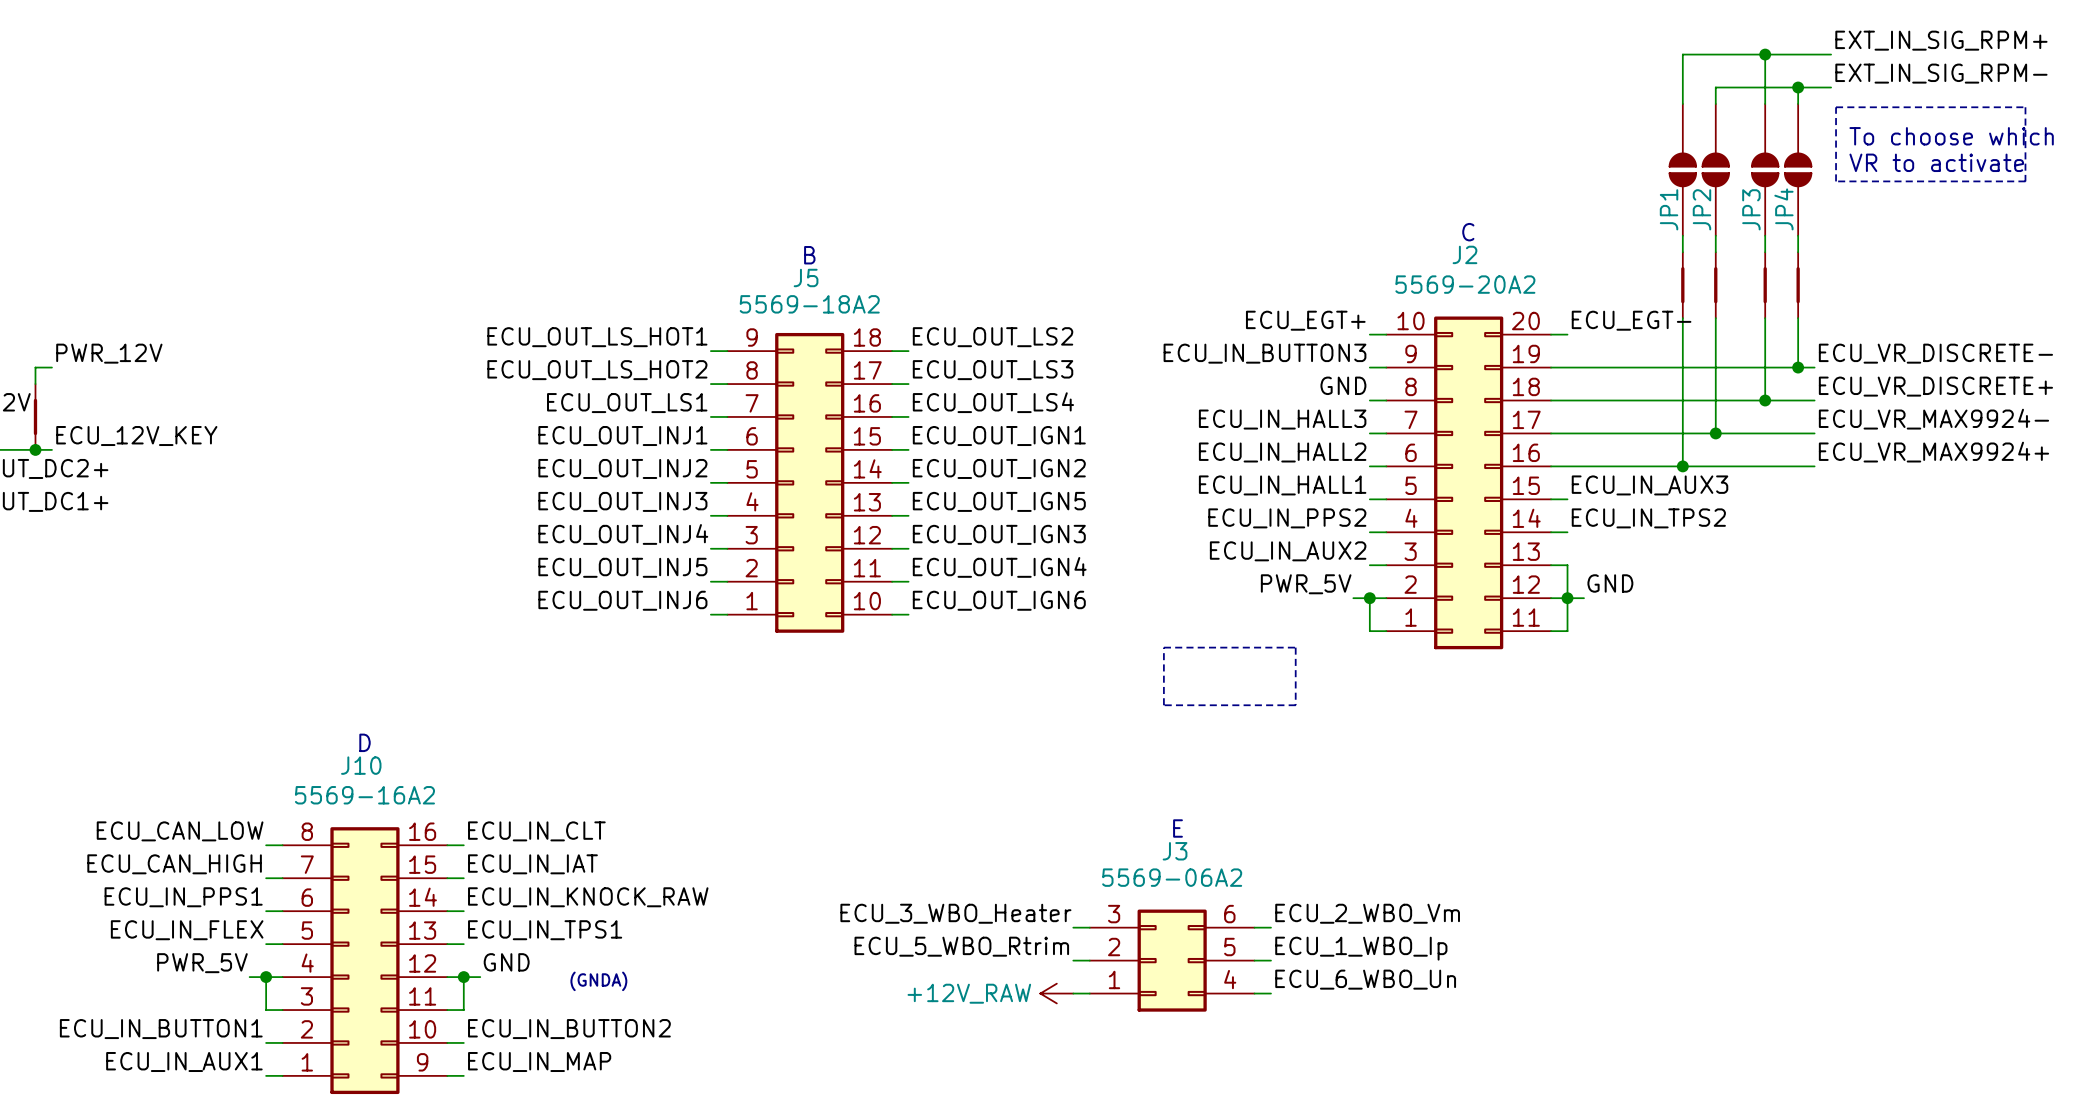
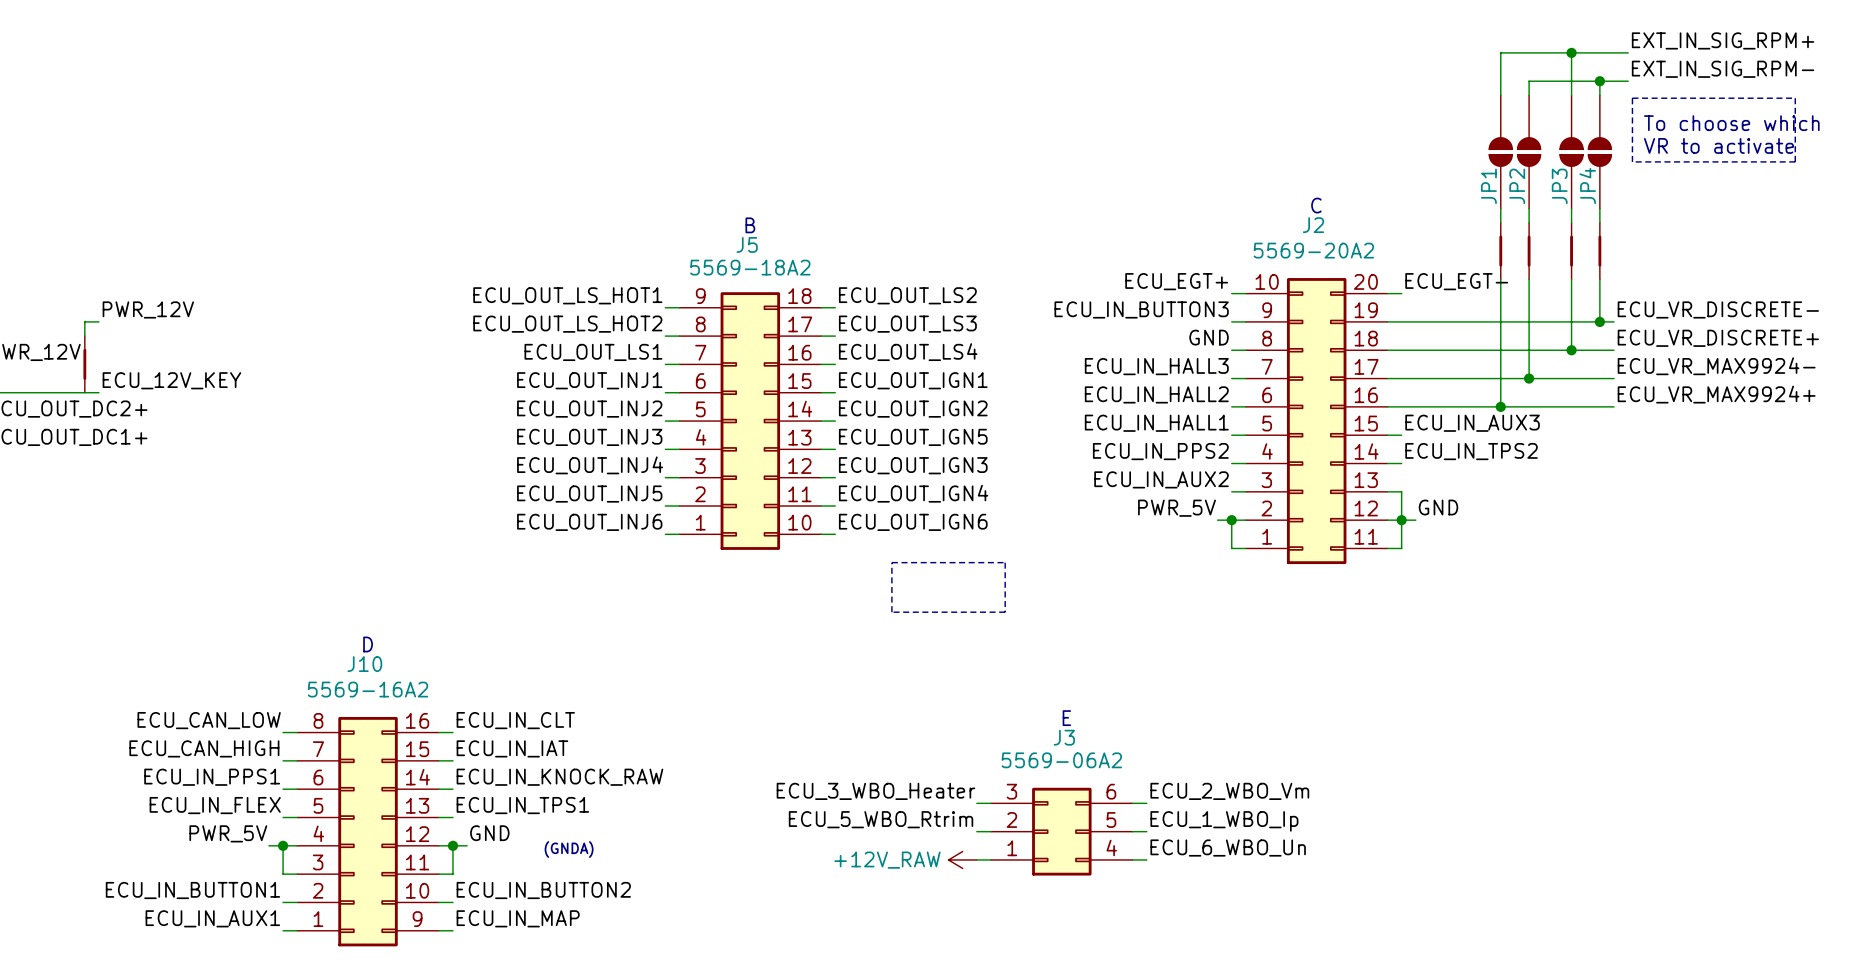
junction: (35, 449) -> none
line: (1163, 647) (1295, 647) (1295, 705) (1163, 705) (1163, 647) -> (891, 562) (1005, 562) (1005, 612) (891, 612) (891, 562)

